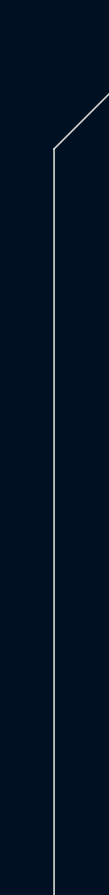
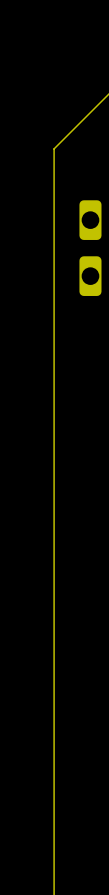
part: none -> (90, 248)

